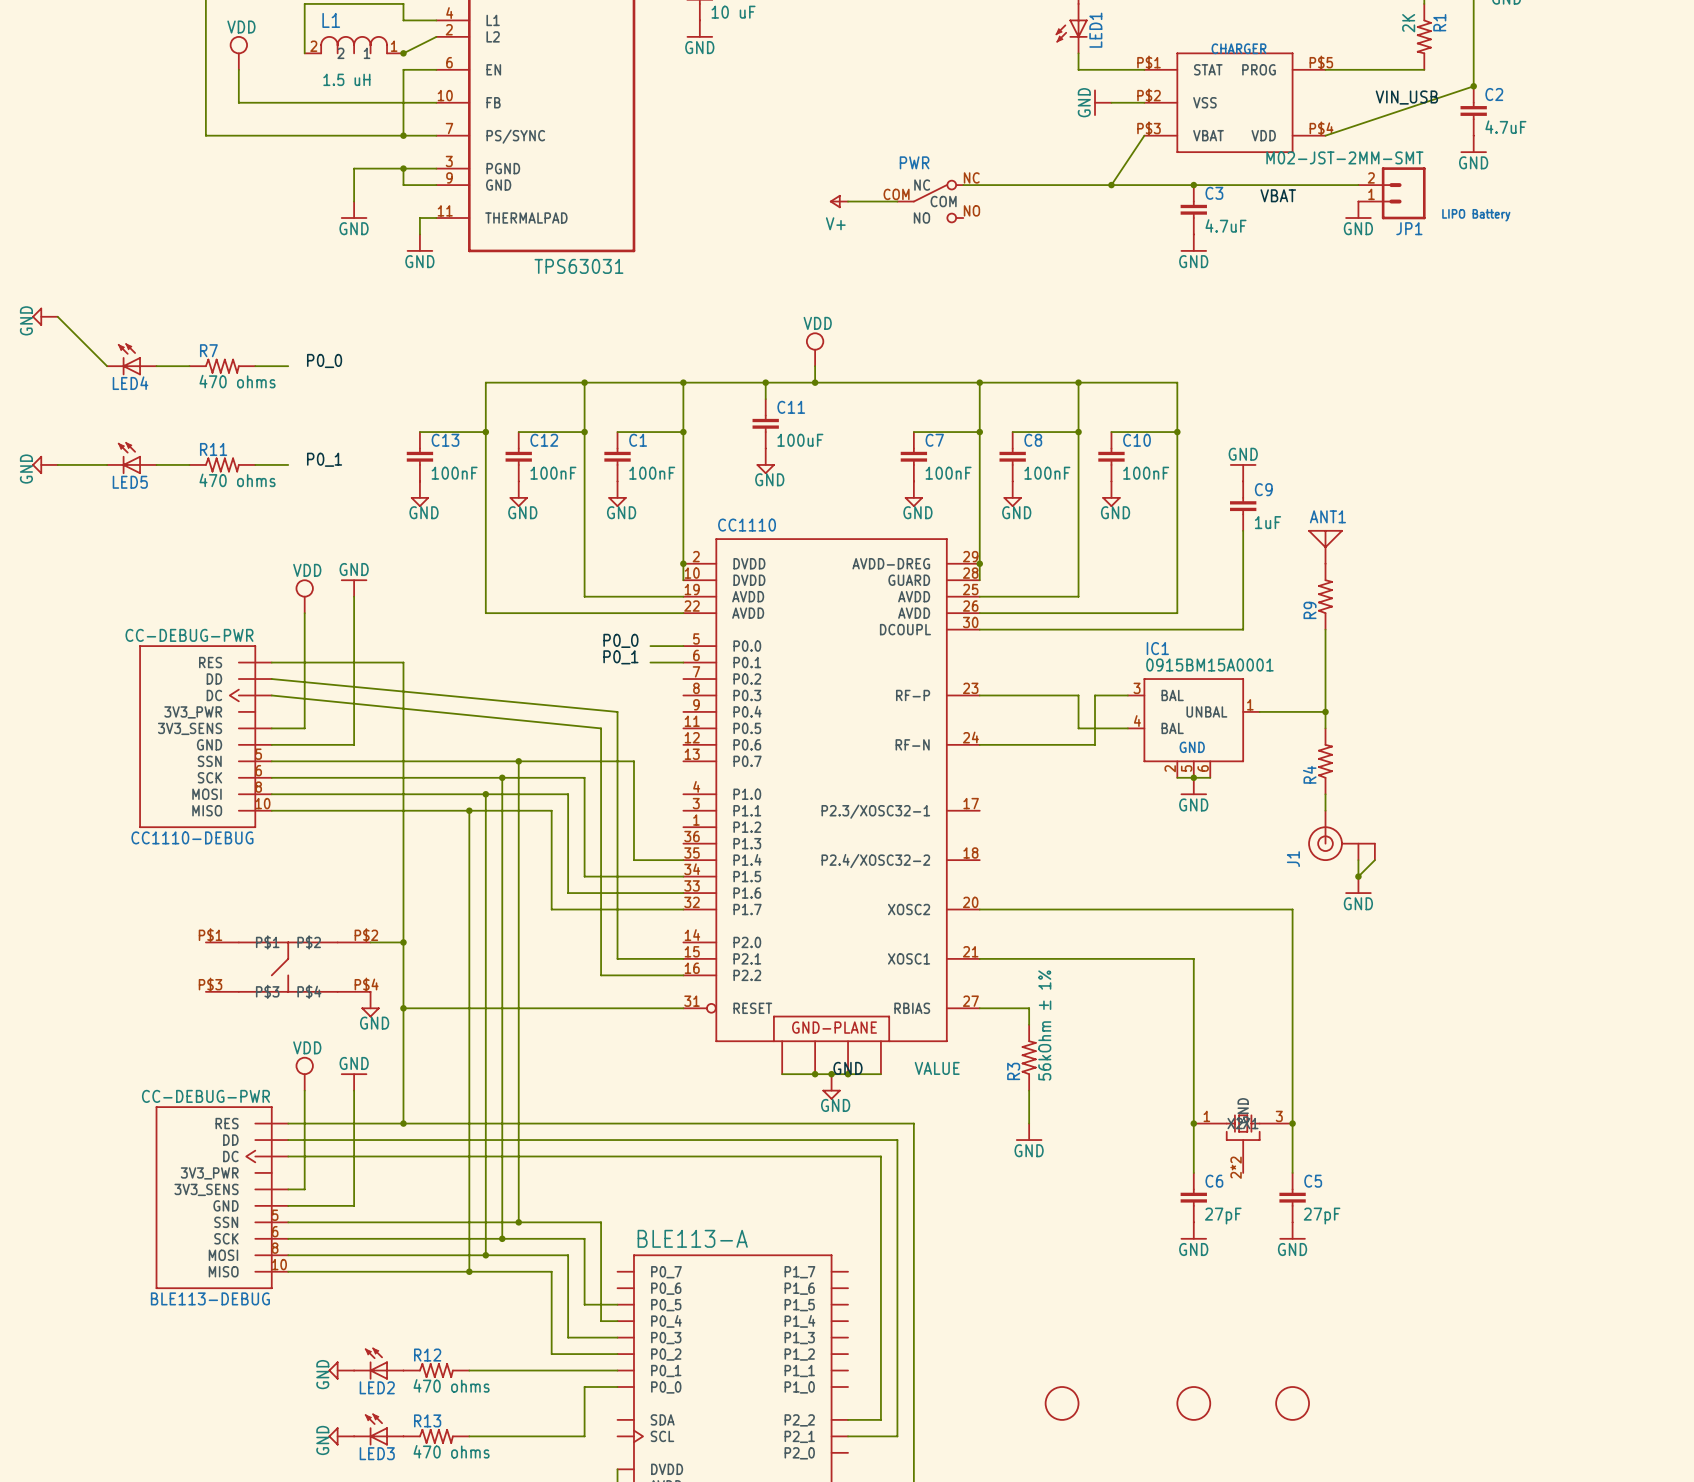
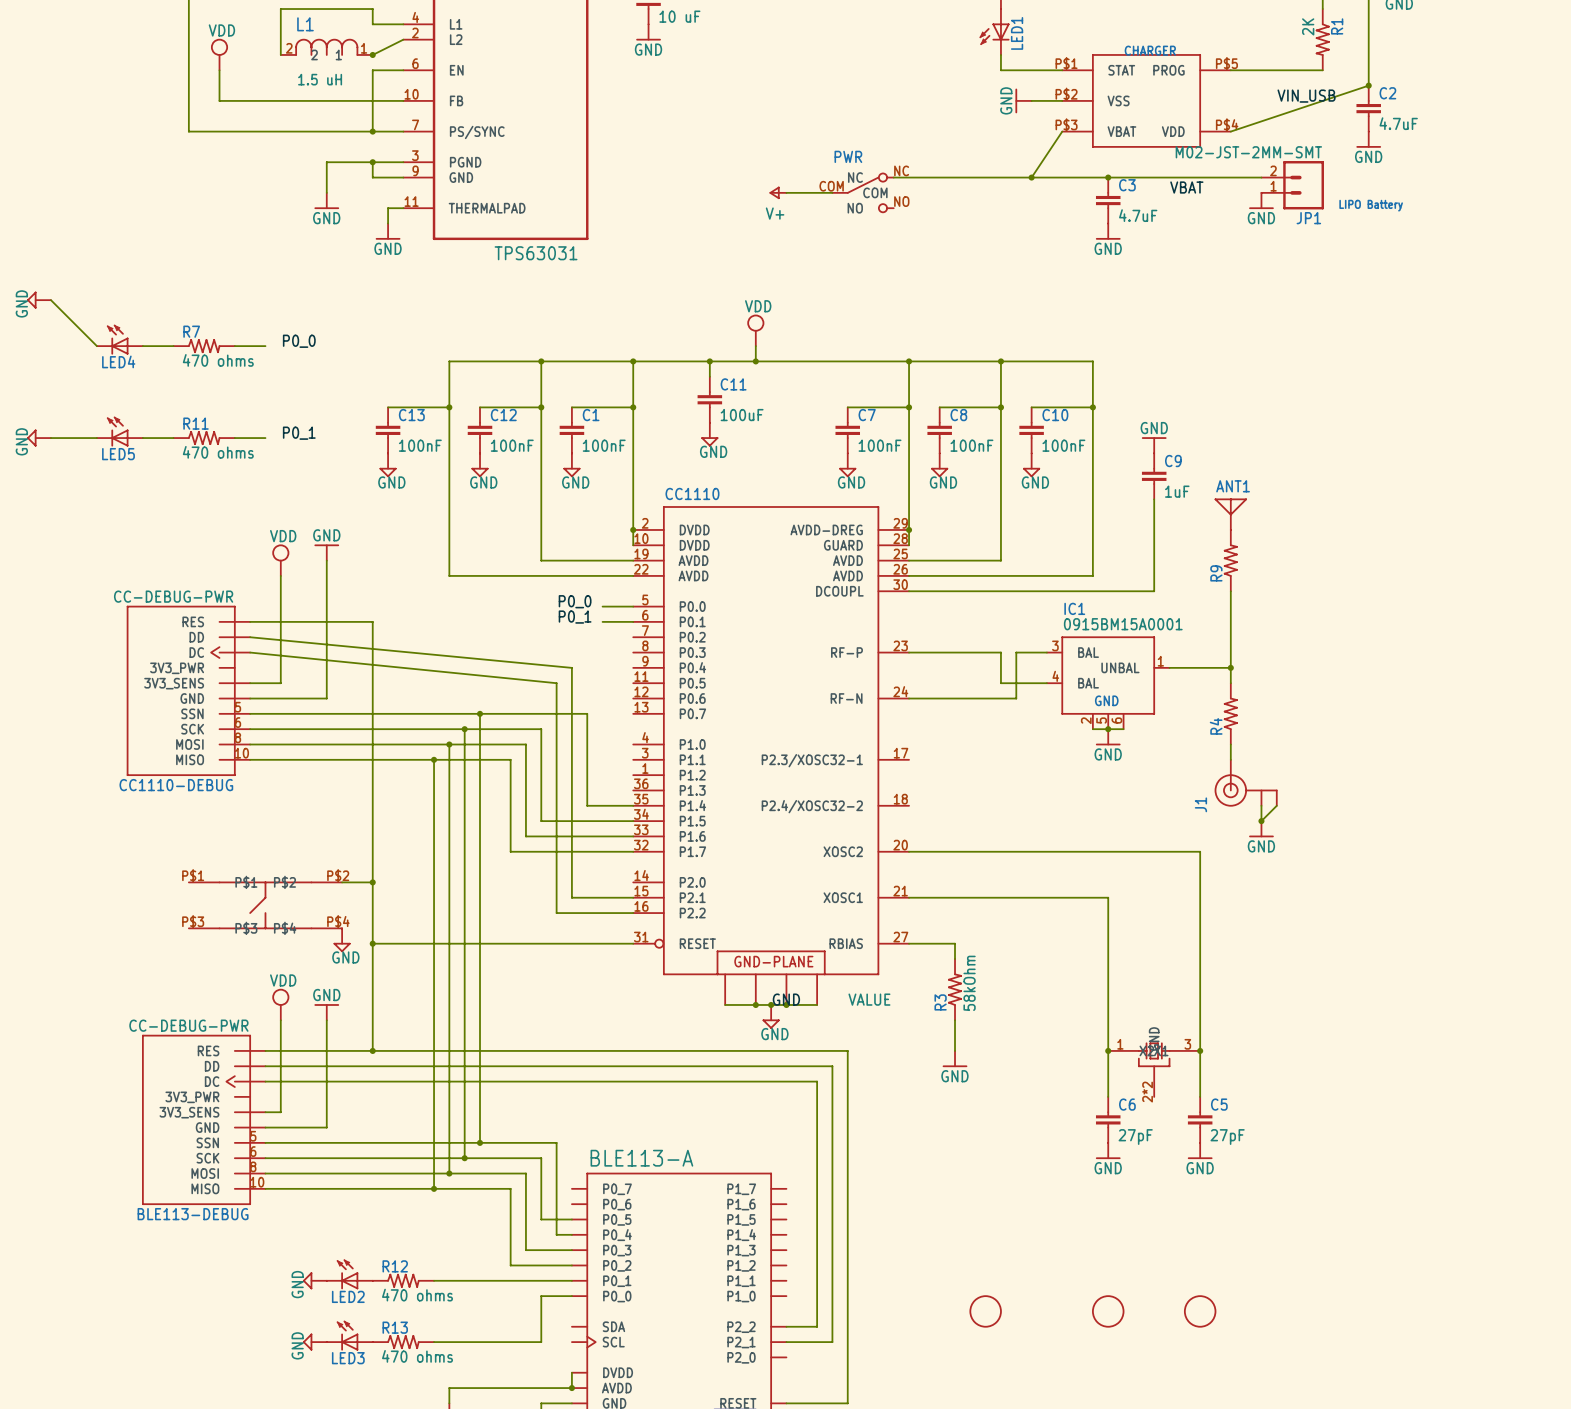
R3 value: 56kOhm ± 1% (1044, 1025) -> 58kOhm (969, 983)

